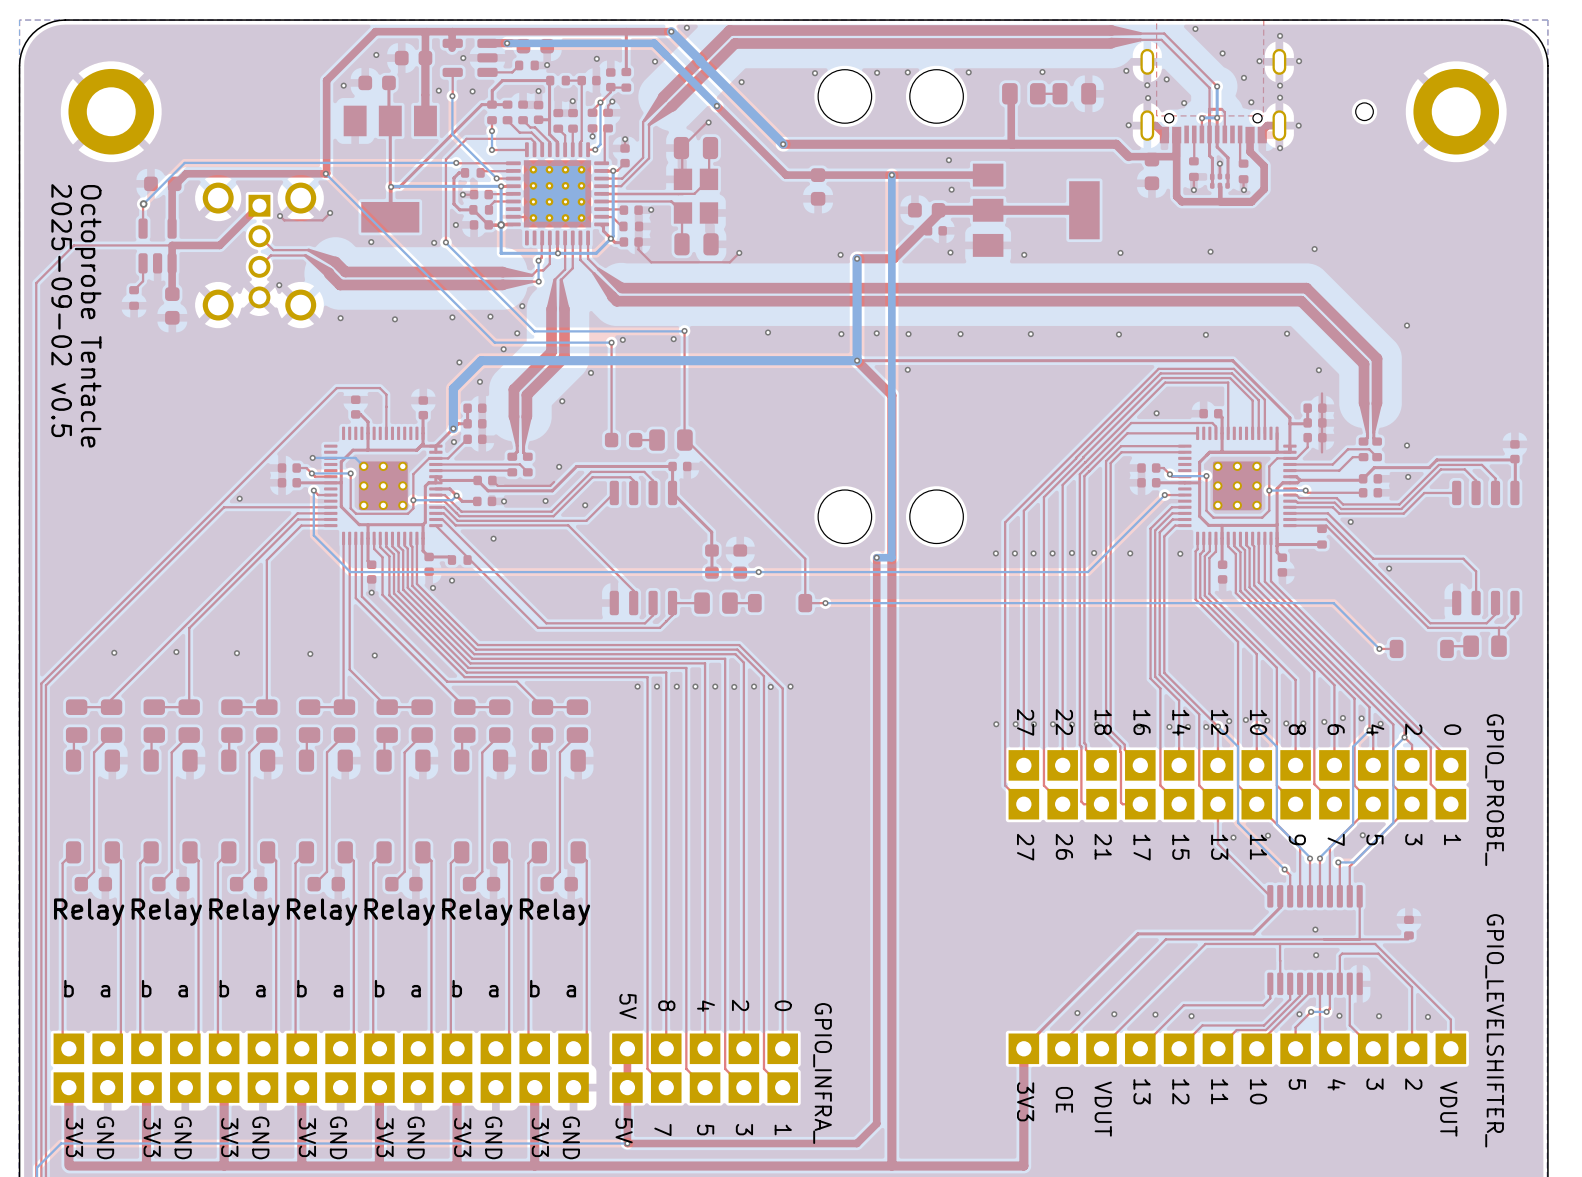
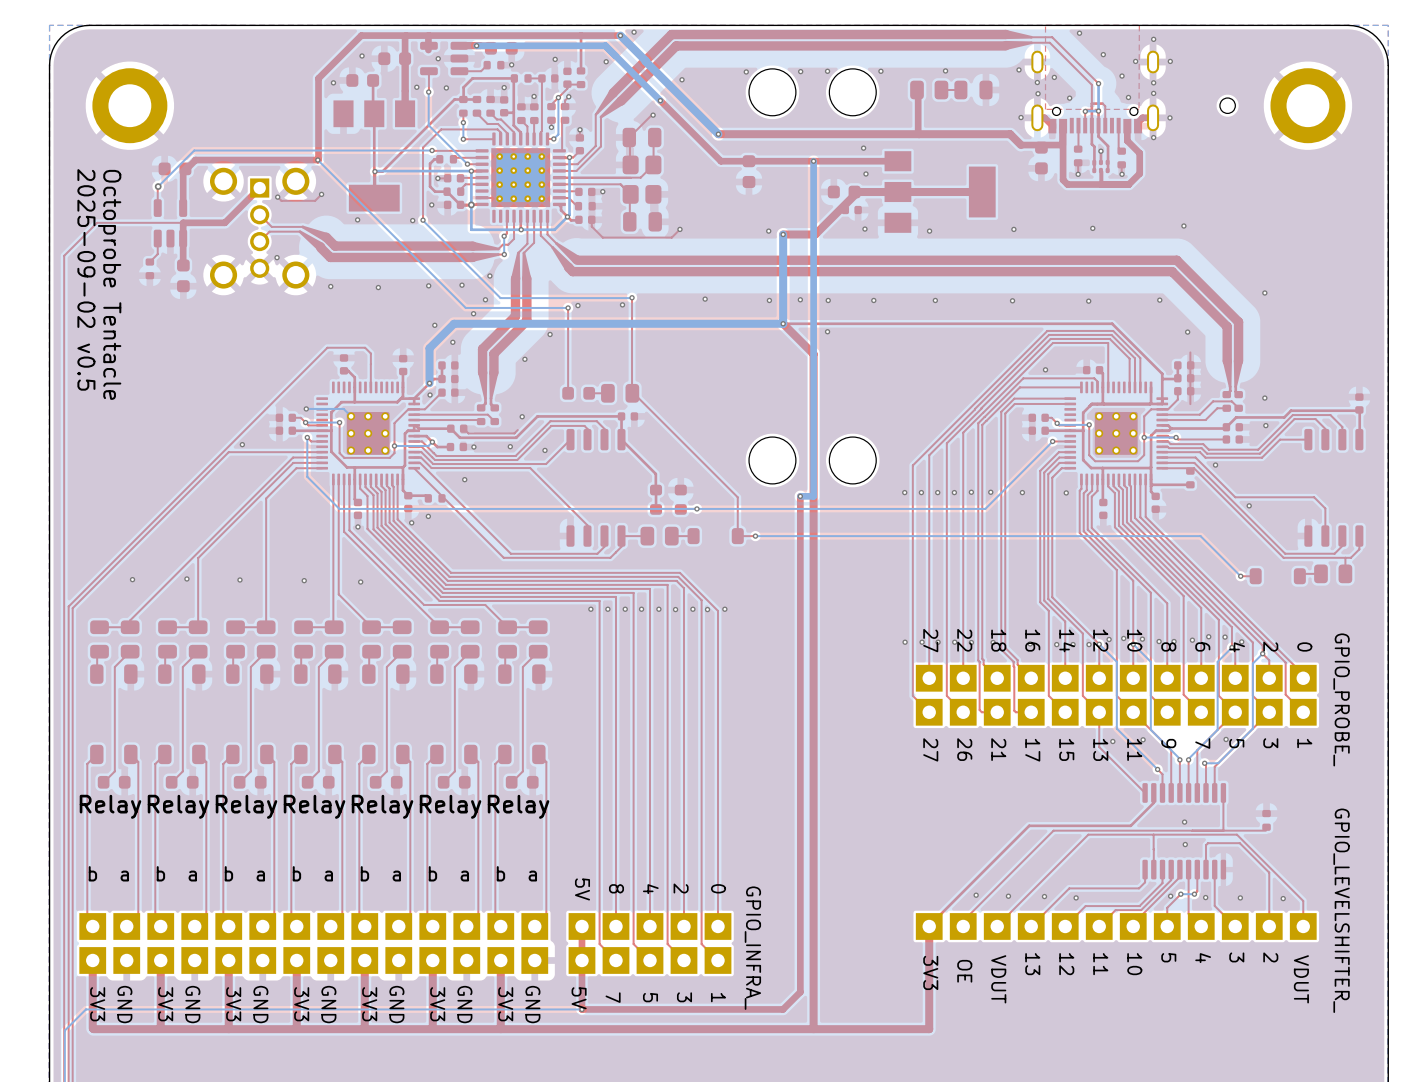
part footprint: [673, 168, 719, 224] -> [622, 155, 662, 204]

